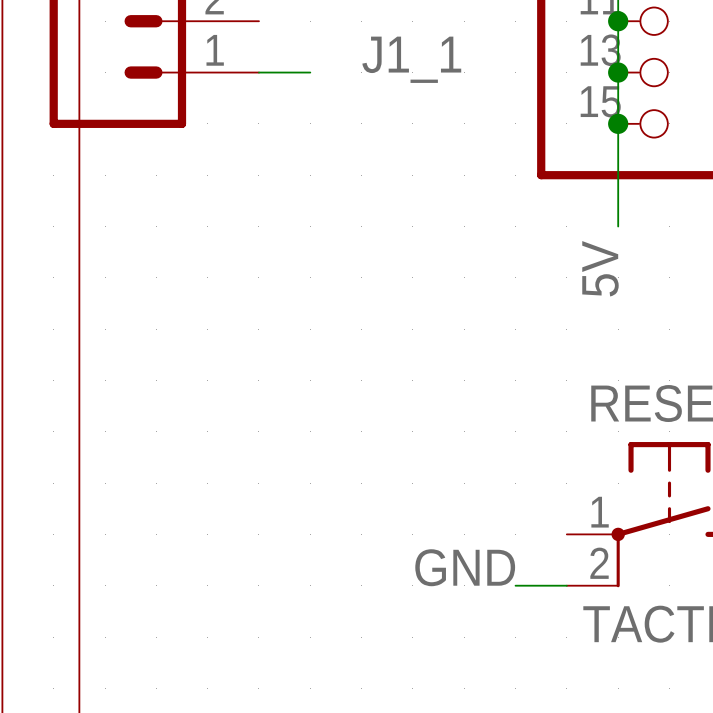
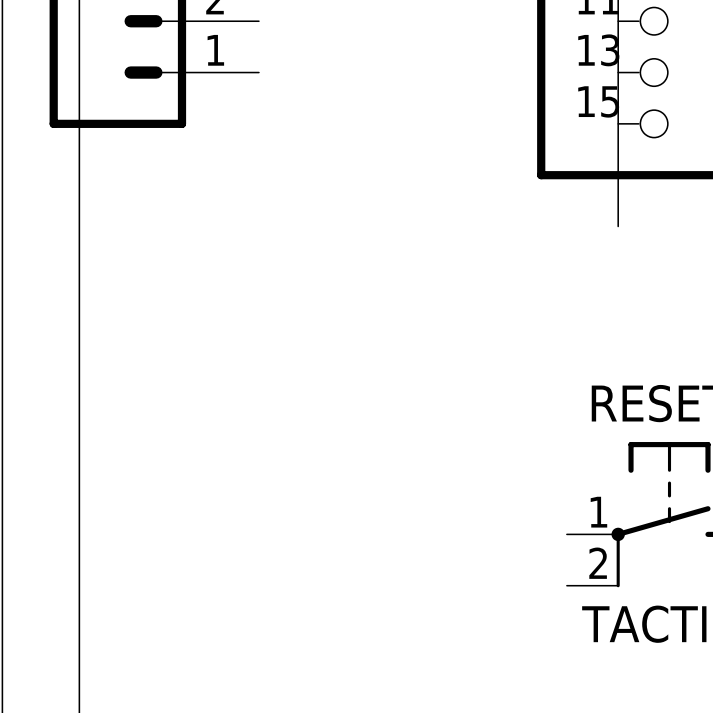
junction: (618, 21) -> none
label: J1_1 (411, 59) -> none
wire: (258, 72) (310, 72) -> none
junction: (618, 72) -> none
junction: (618, 123) -> none
label: 5V (600, 268) -> none
label: GND (465, 567) -> none
wire: (515, 585) (566, 585) -> none

